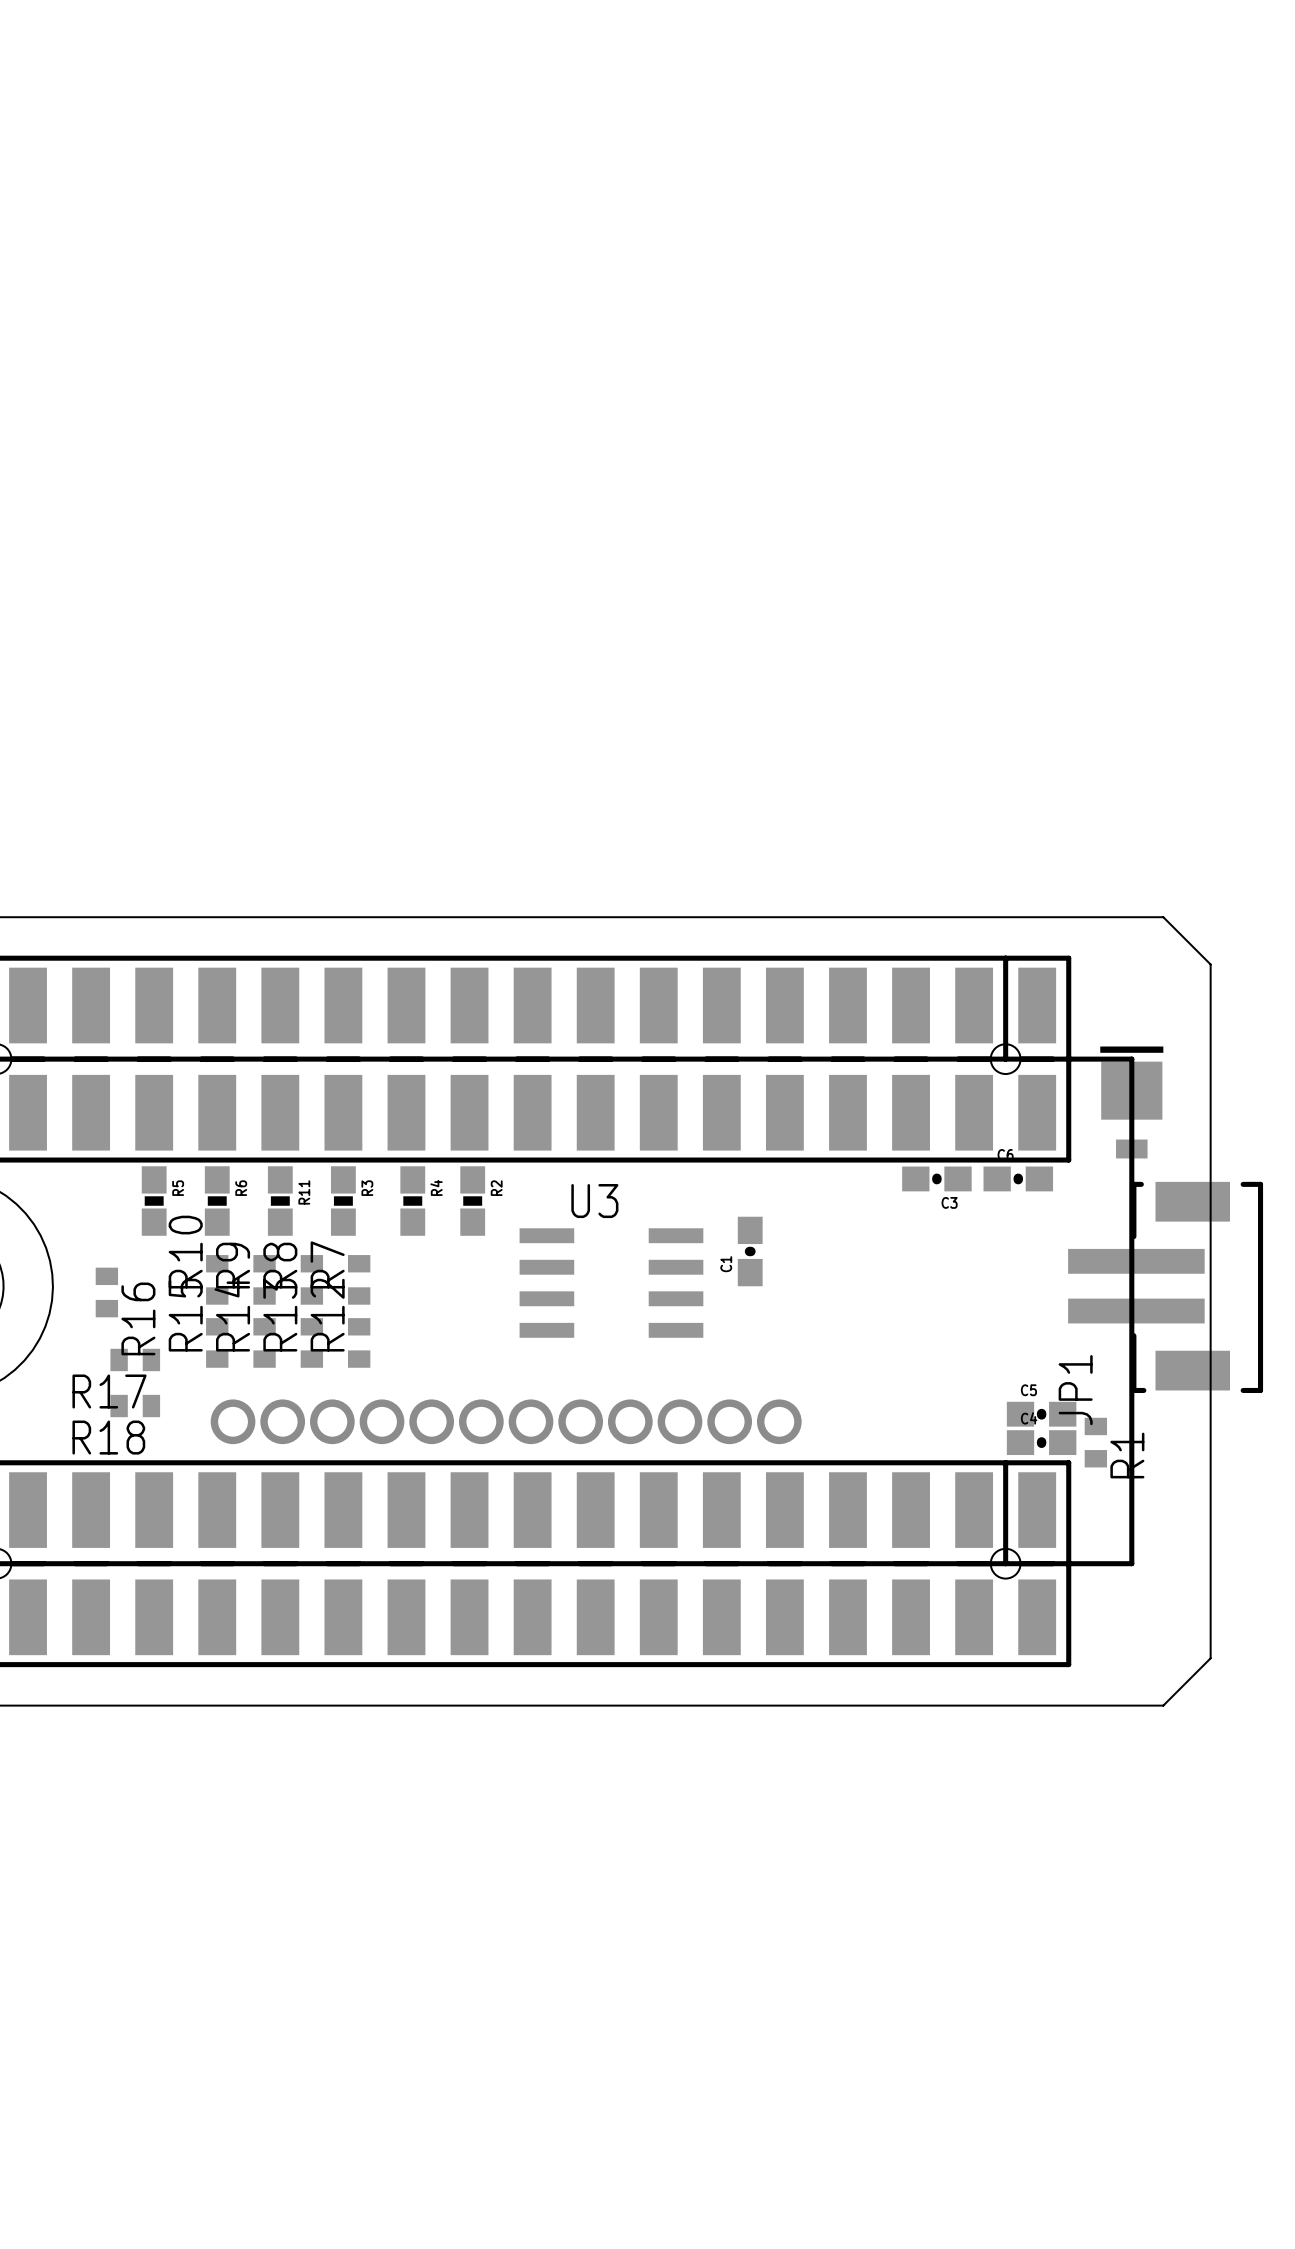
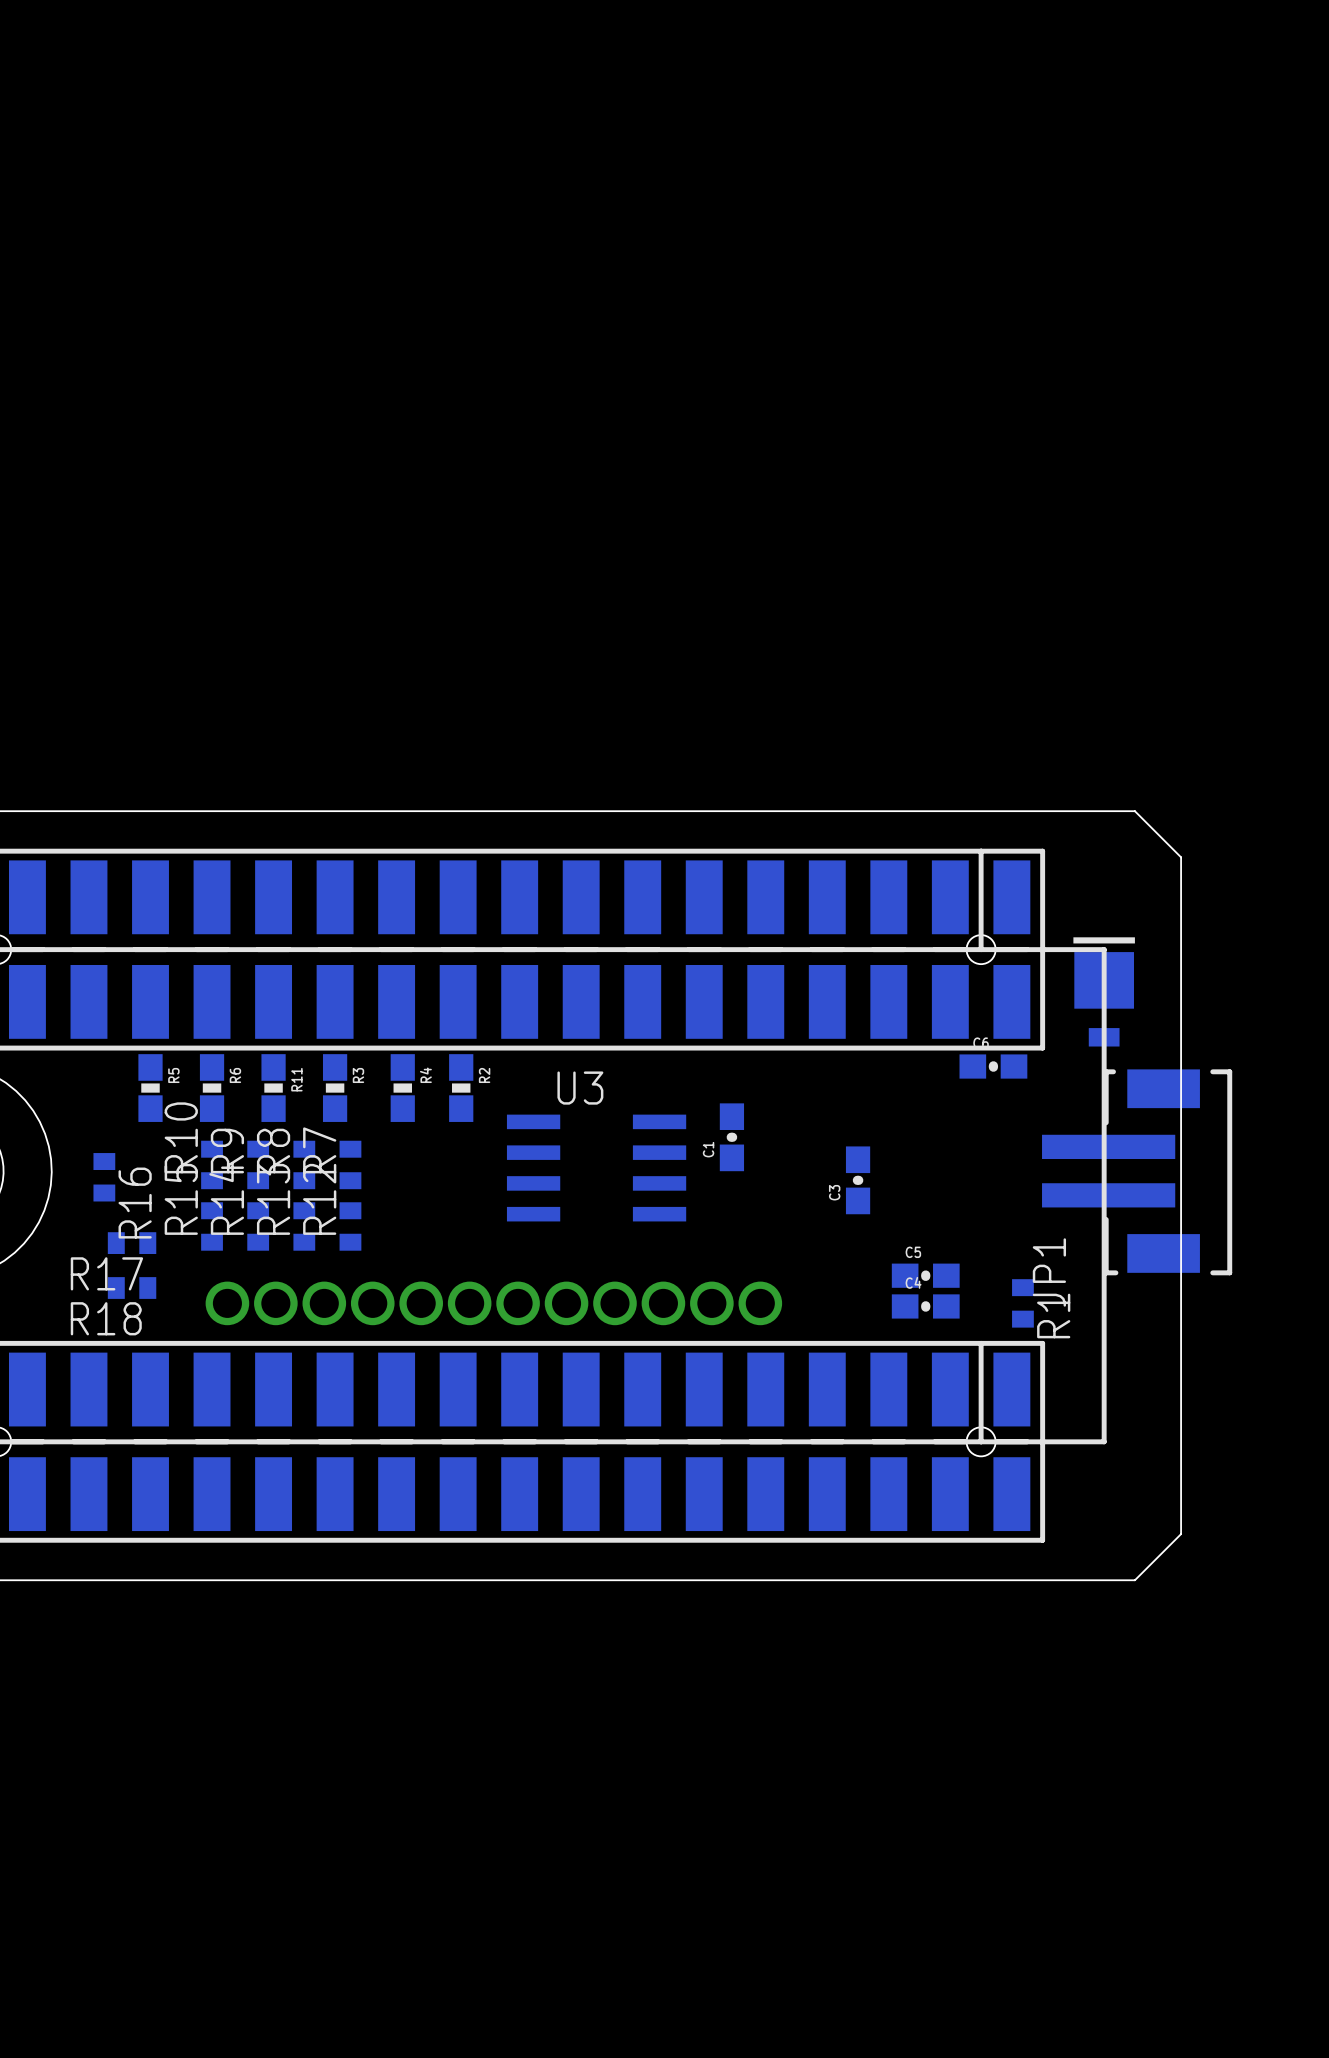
C3 rotation: 0° (936, 1178) -> 90° clockwise (858, 1180)
C3 position: (936, 1178) -> (858, 1180)
C5 position: (1041, 1414) -> (925, 1275)
C4 position: (1041, 1442) -> (925, 1306)
R1 position: (1095, 1442) -> (1022, 1303)

